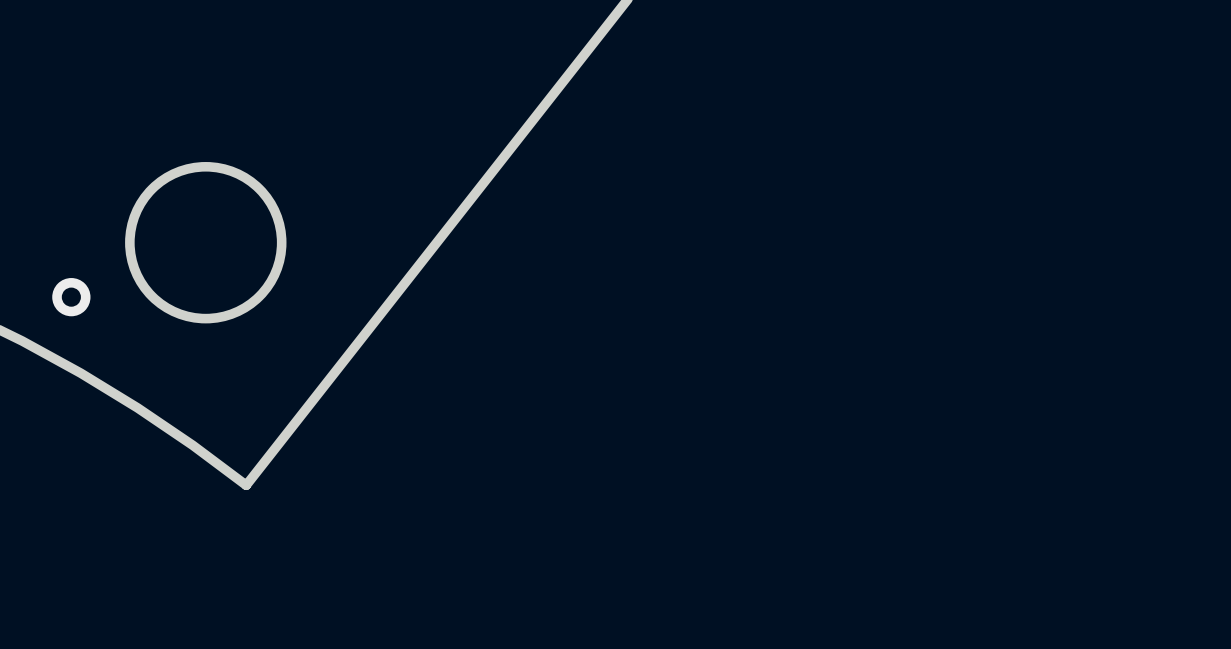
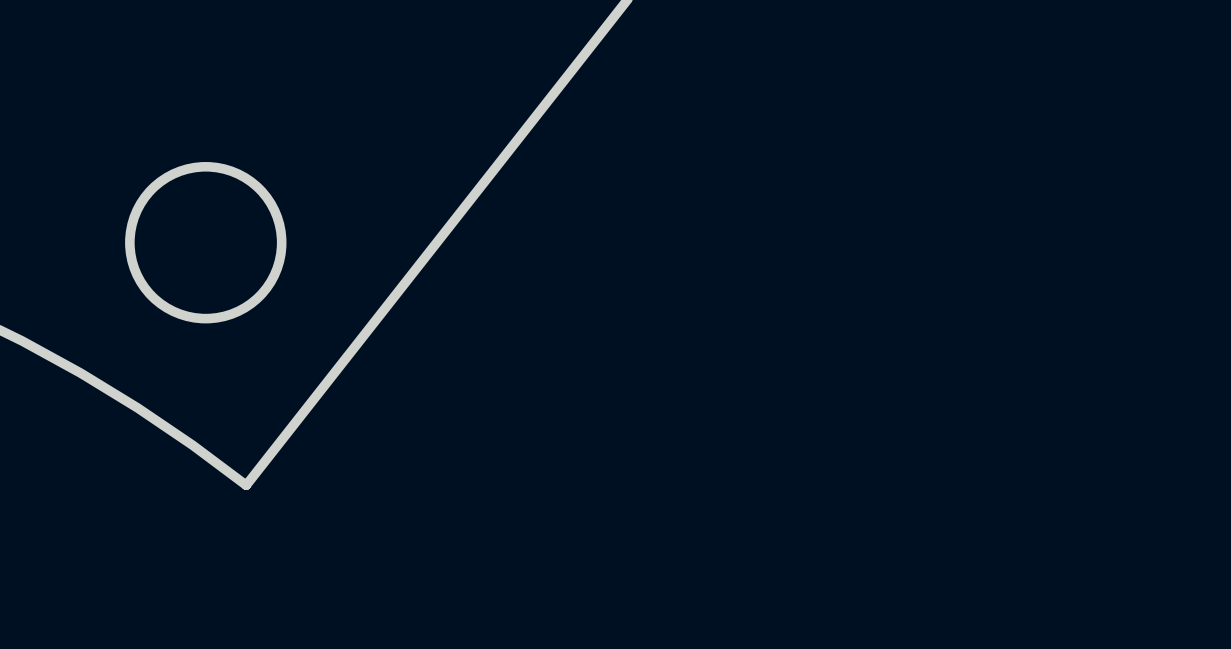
via: (71, 297) -> none

